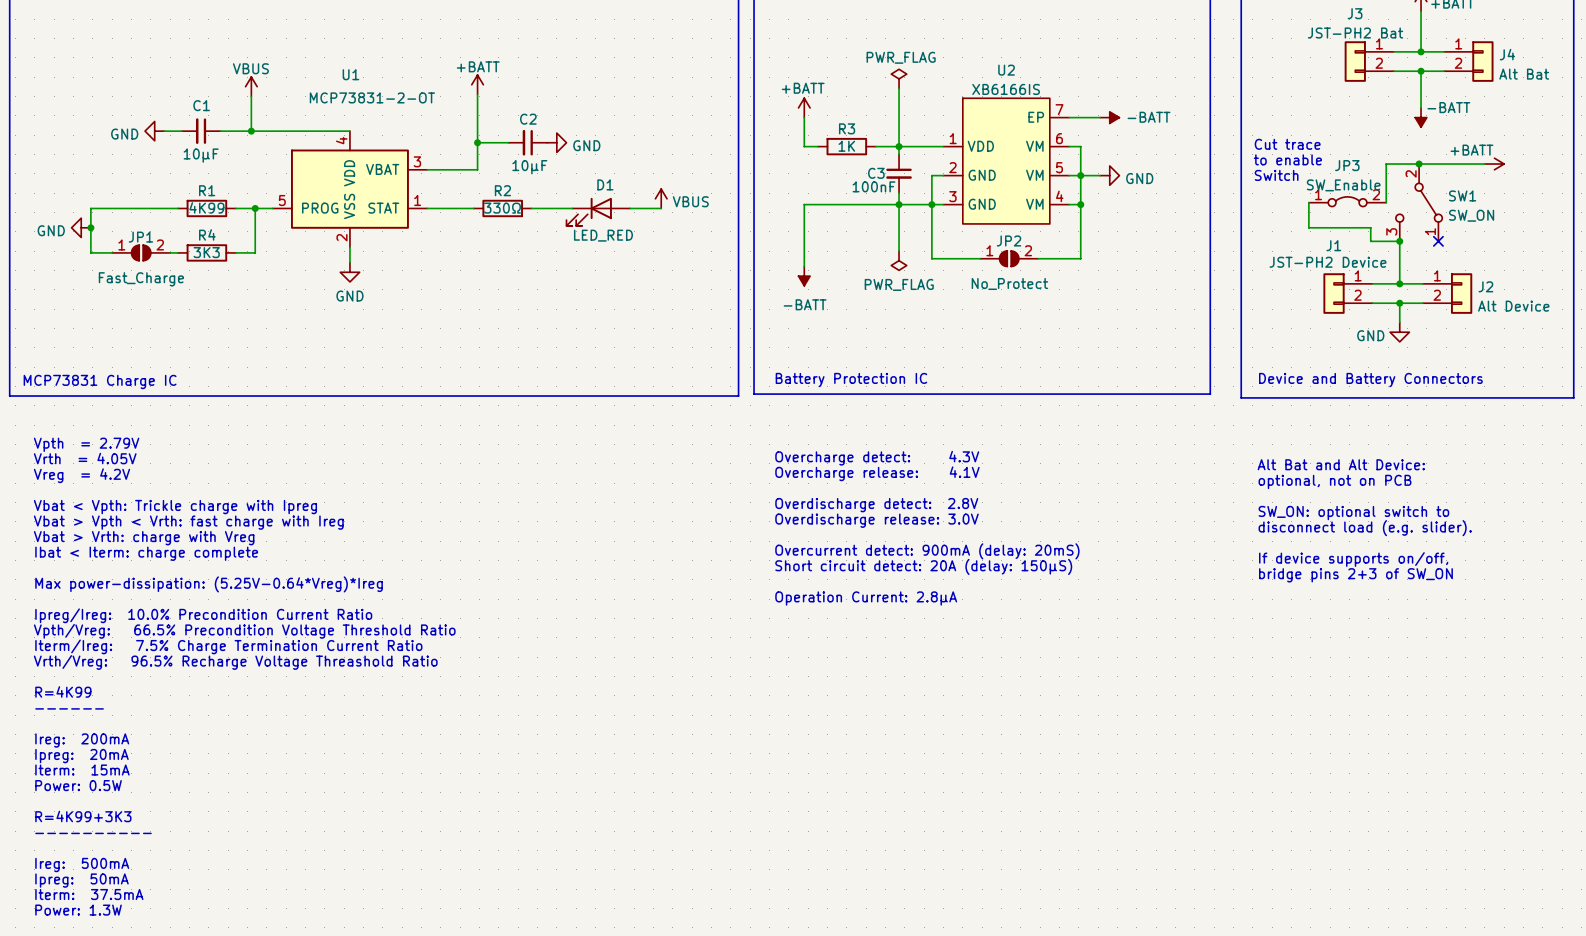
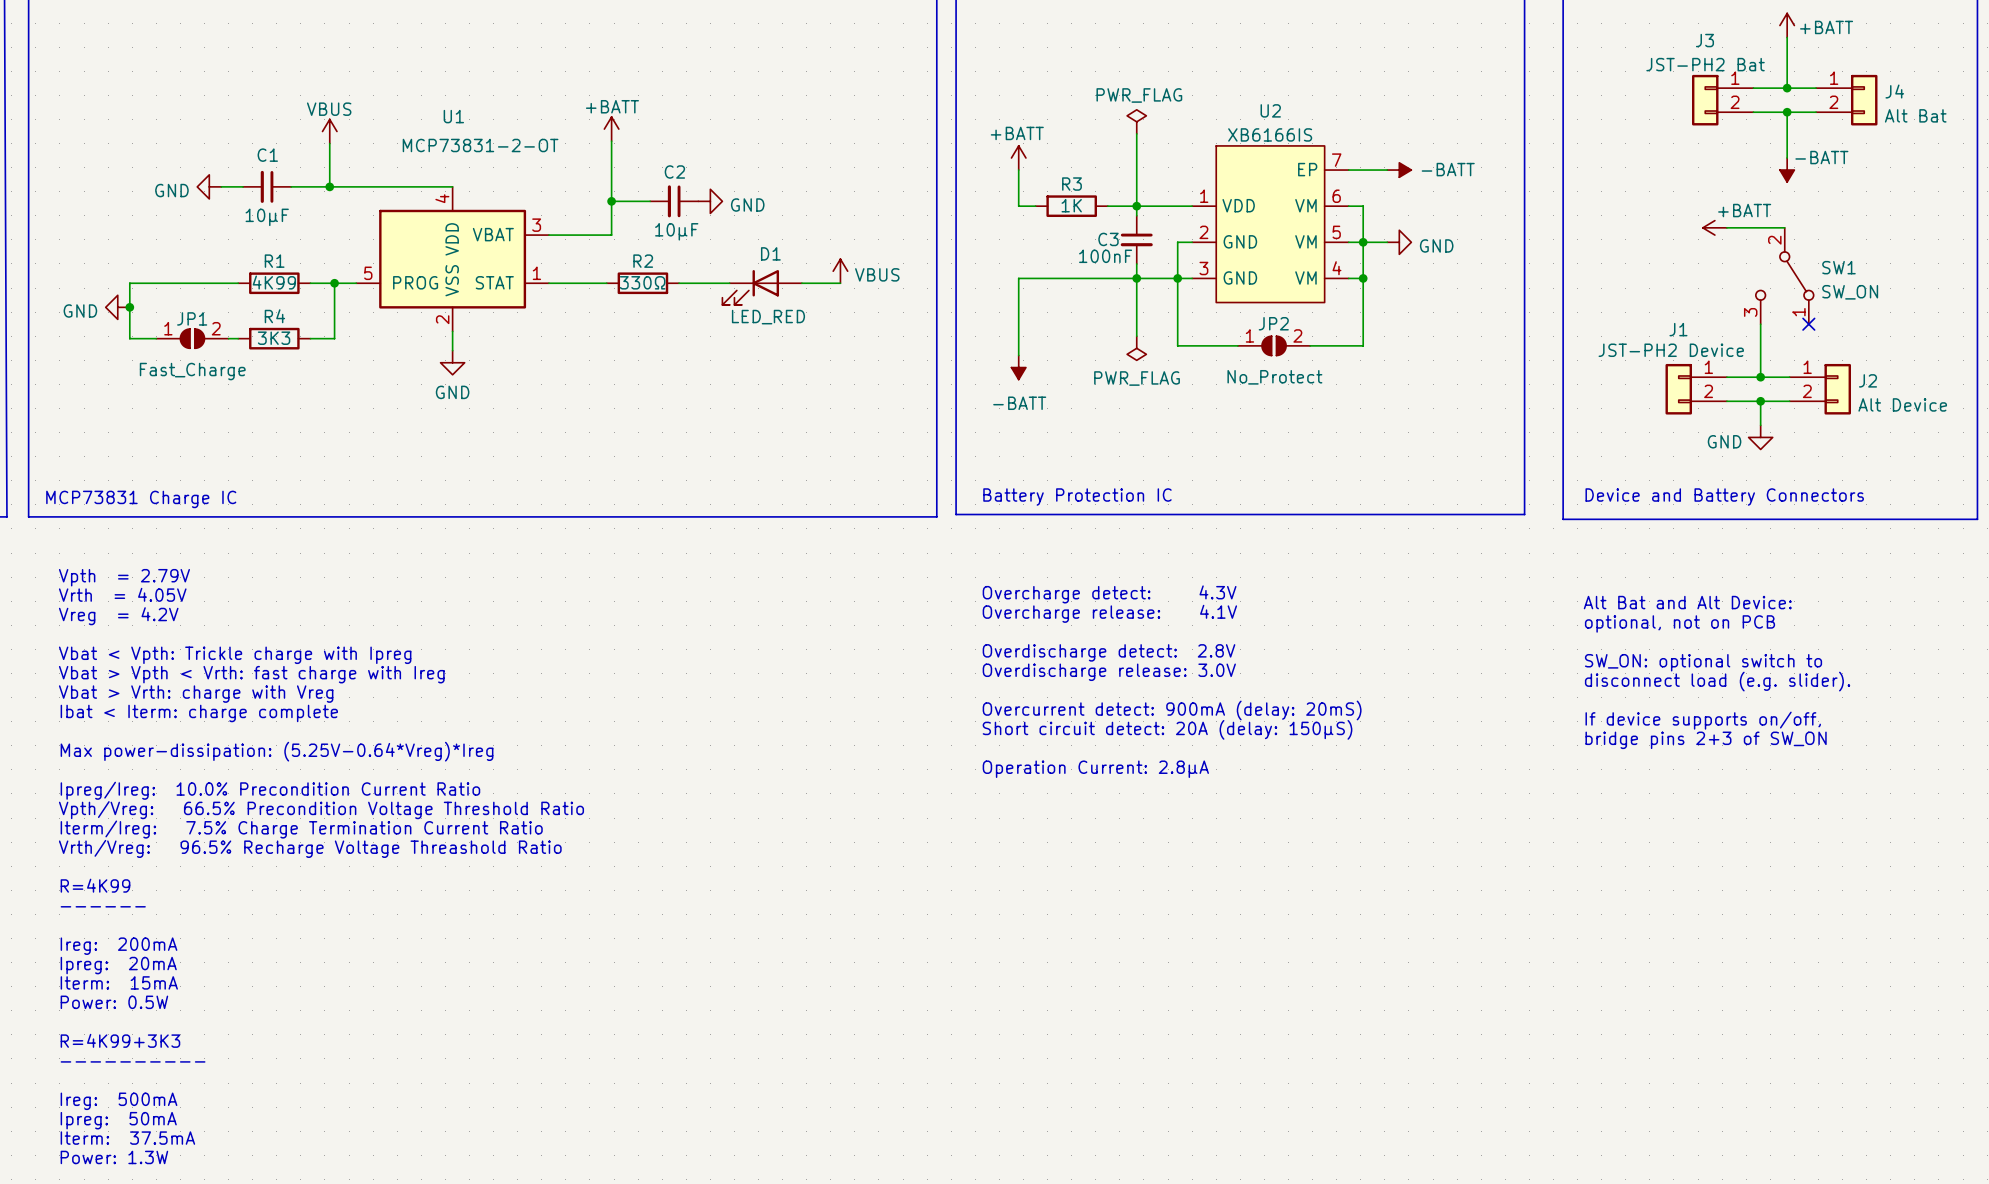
text: Cut trace (1287, 144) -> none
power symbol text position: +BATT (1471, 150) -> +BATT (1744, 210)
text: to enable (1287, 159) -> none
wire: (1386, 164) (1386, 202) -> (1743, 227) (1726, 227)
wire: (1419, 164) (1484, 164) -> none
junction: (1419, 164) -> none
power symbol rotation: 0° (1494, 164) -> 180° (1714, 227)
power symbol position: +BATT (1494, 164) -> +BATT (1714, 227)
text: Switch (1276, 175) -> none
JP3: SW_Enable (1347, 201) -> none
wire: (1308, 202) (1308, 227) (1370, 227) (1370, 241) (1399, 241) -> none
junction: (1399, 241) -> none

